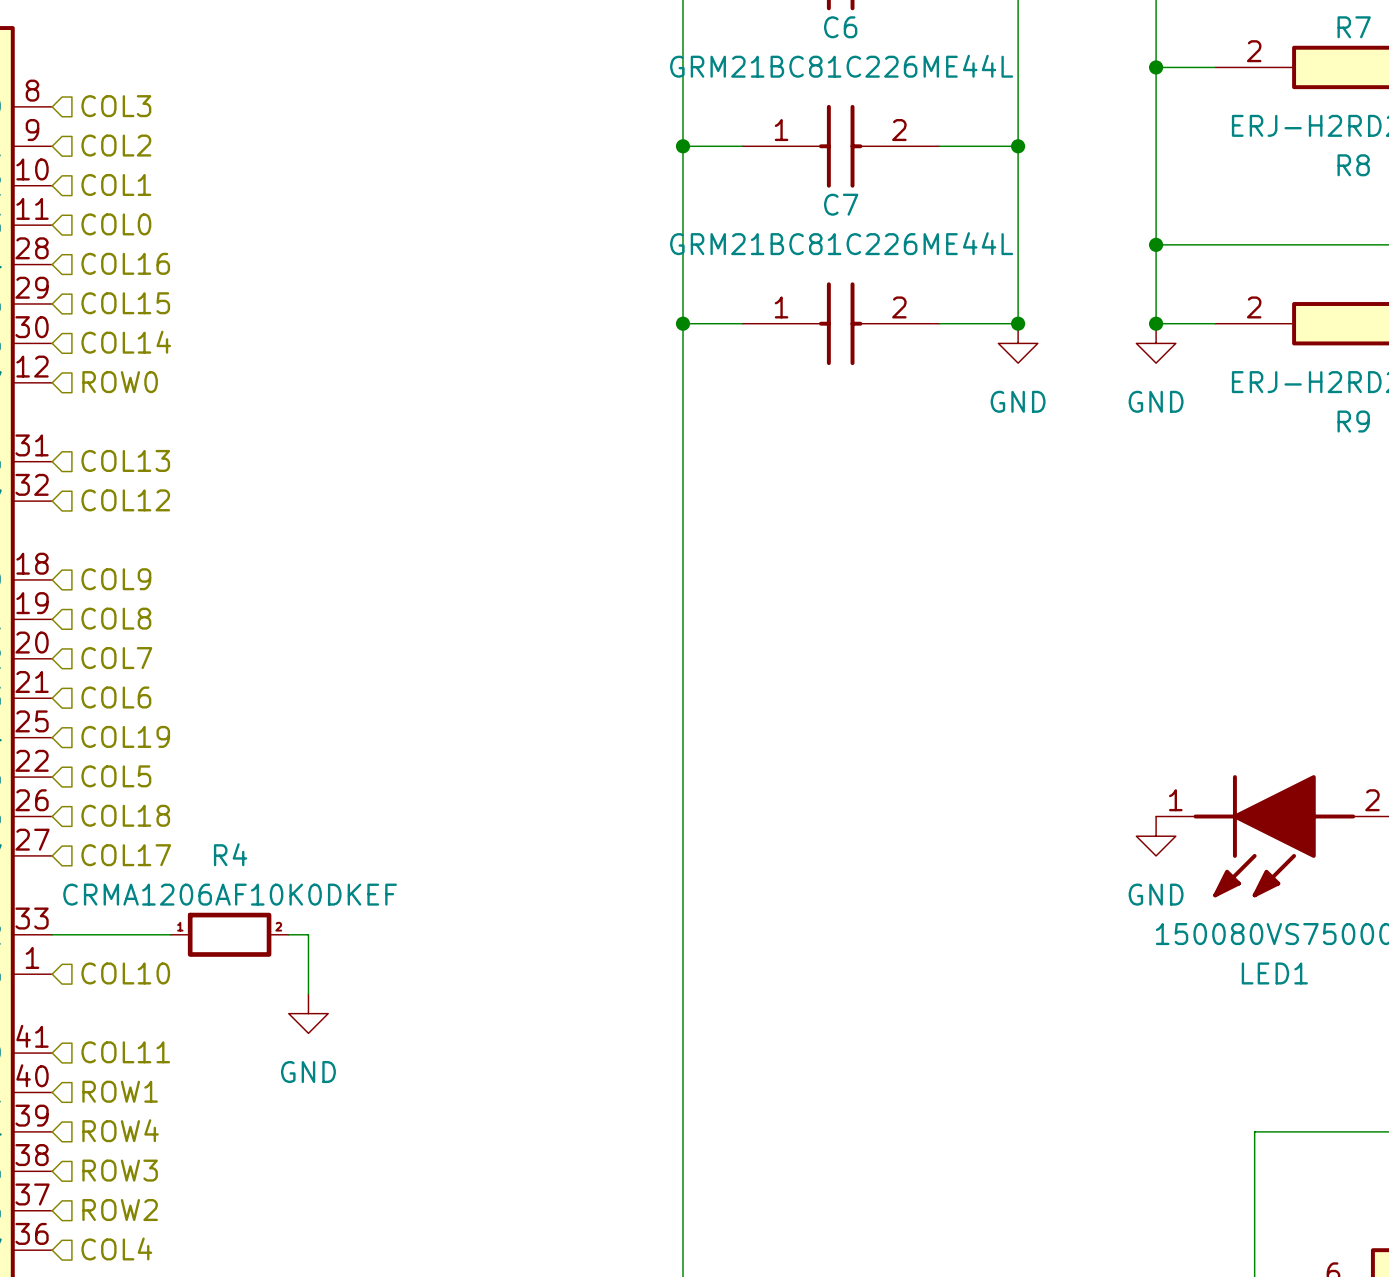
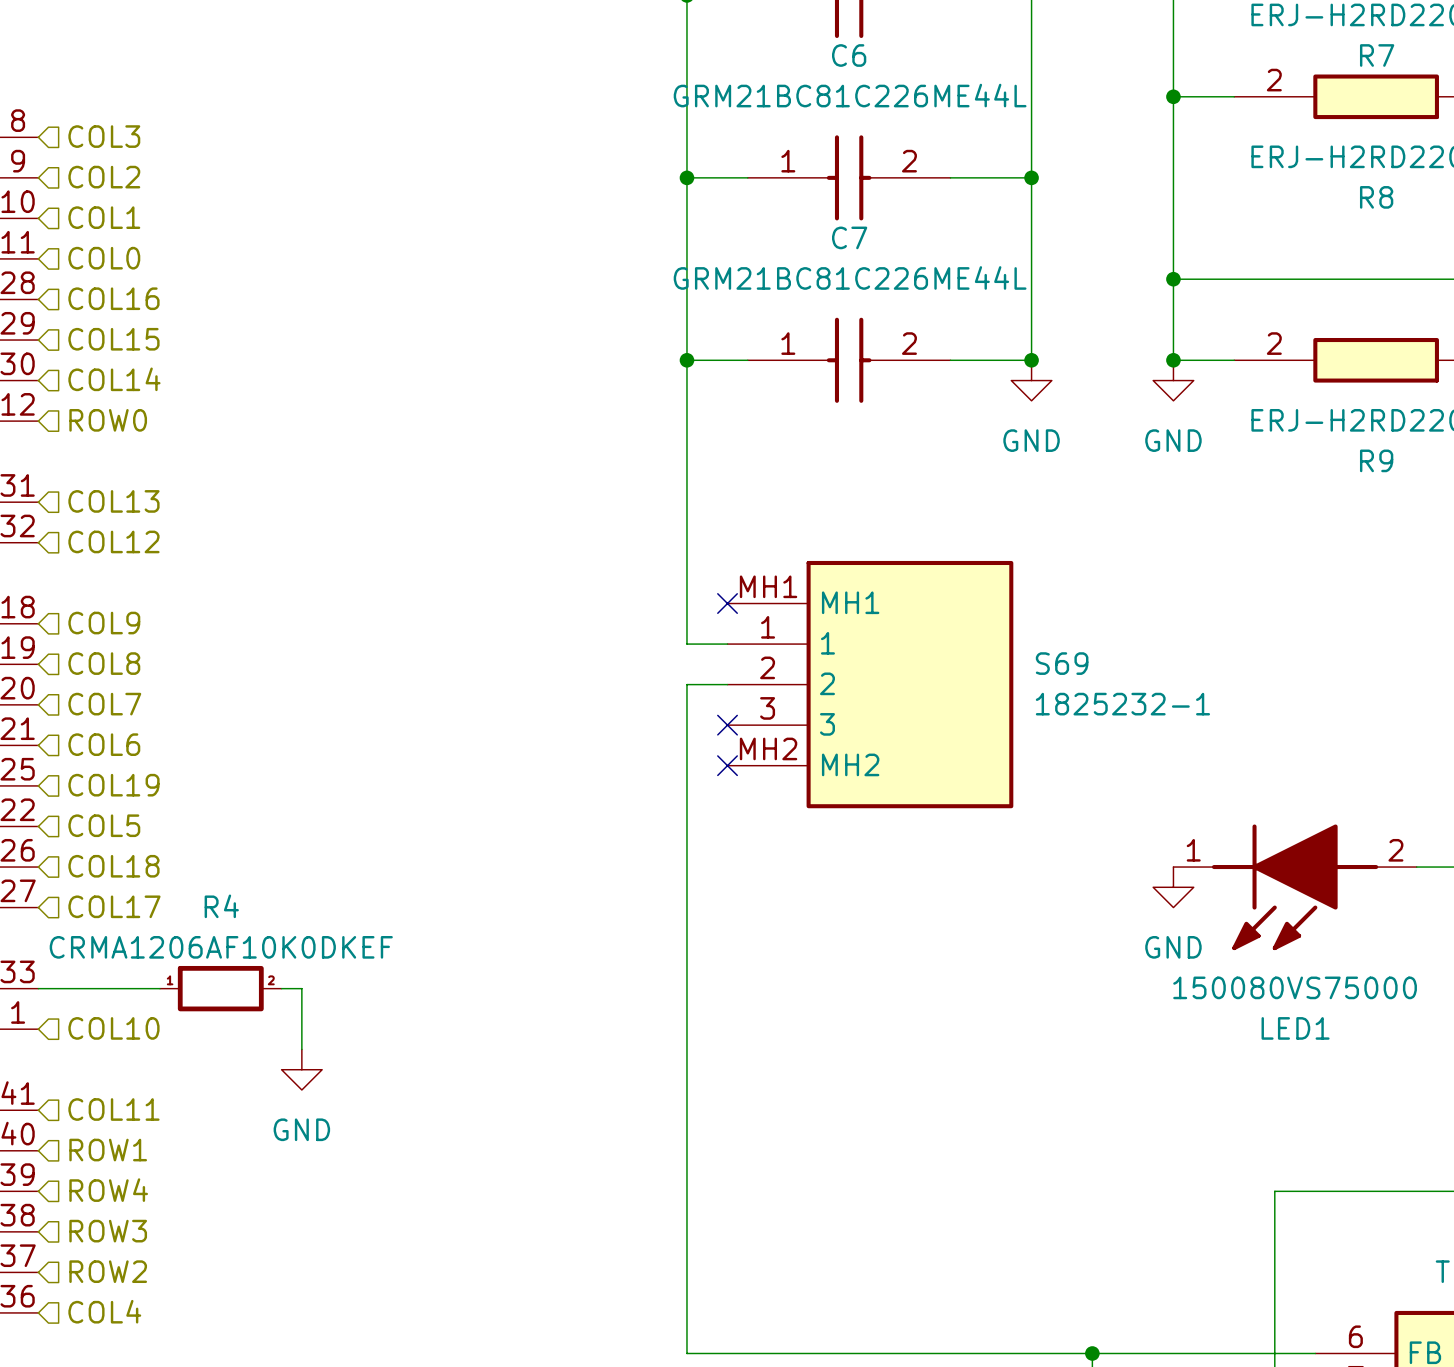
no-connect mark: none -> (727, 603)
wire: (682, 599) (682, 639) -> (686, 644) (727, 644)
wire: none -> (686, 684) (727, 684)
S69: none -> 1825232-1 (870, 684)
no-connect mark: none -> (727, 725)
no-connect mark: none -> (727, 765)

